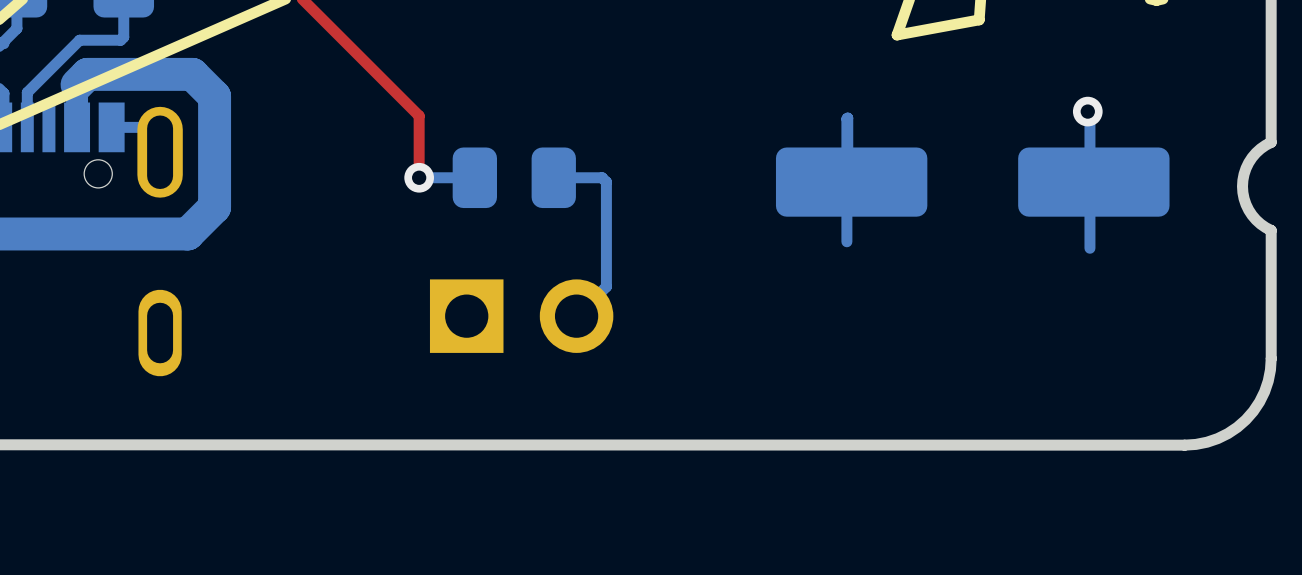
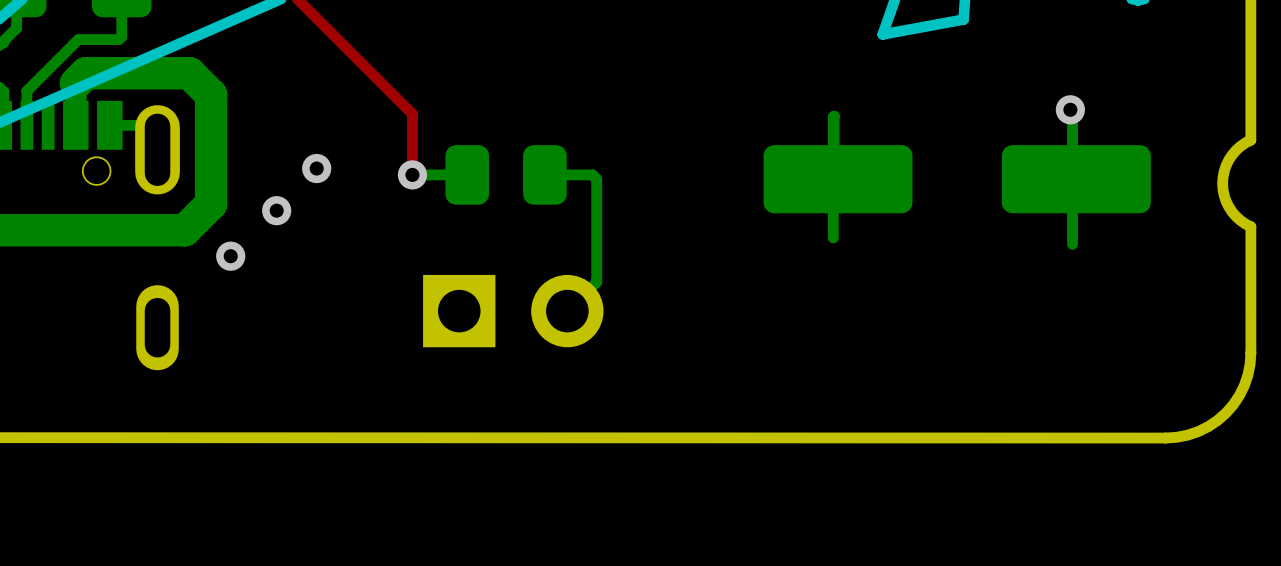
via: none -> (316, 168)
via: none -> (276, 210)
via: none -> (230, 256)

